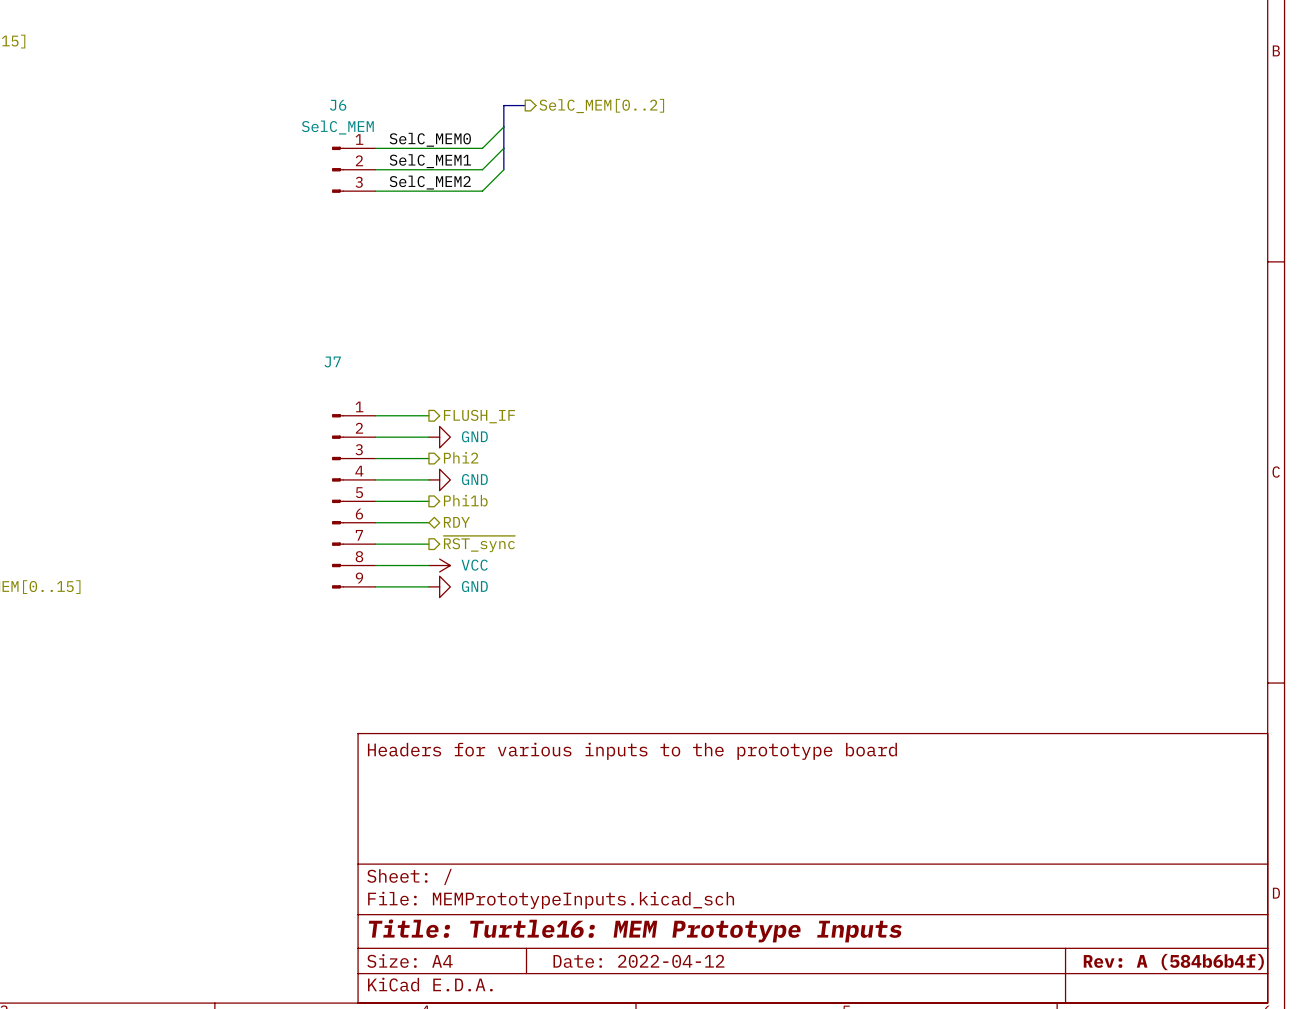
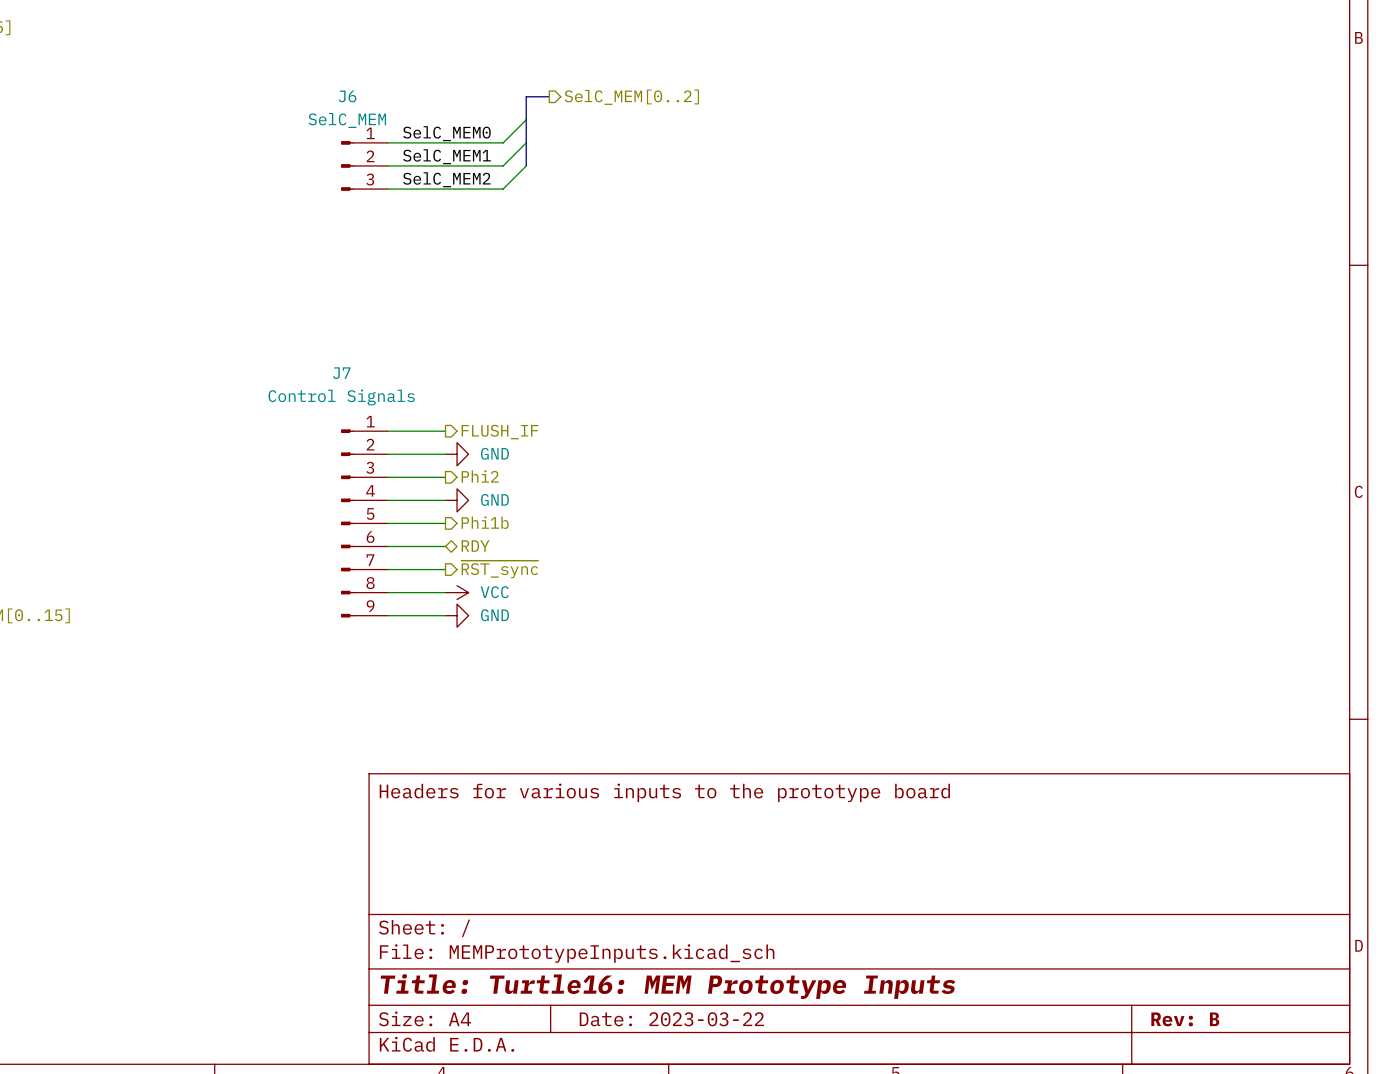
J7 value: none -> Control Signals (341, 397)
title block: Date: 2022-04-12 (638, 961) -> Date: 2023-03-22 (671, 1019)
title block: Rev: A (584b6b4f) (1173, 962) -> Rev: B (1185, 1019)

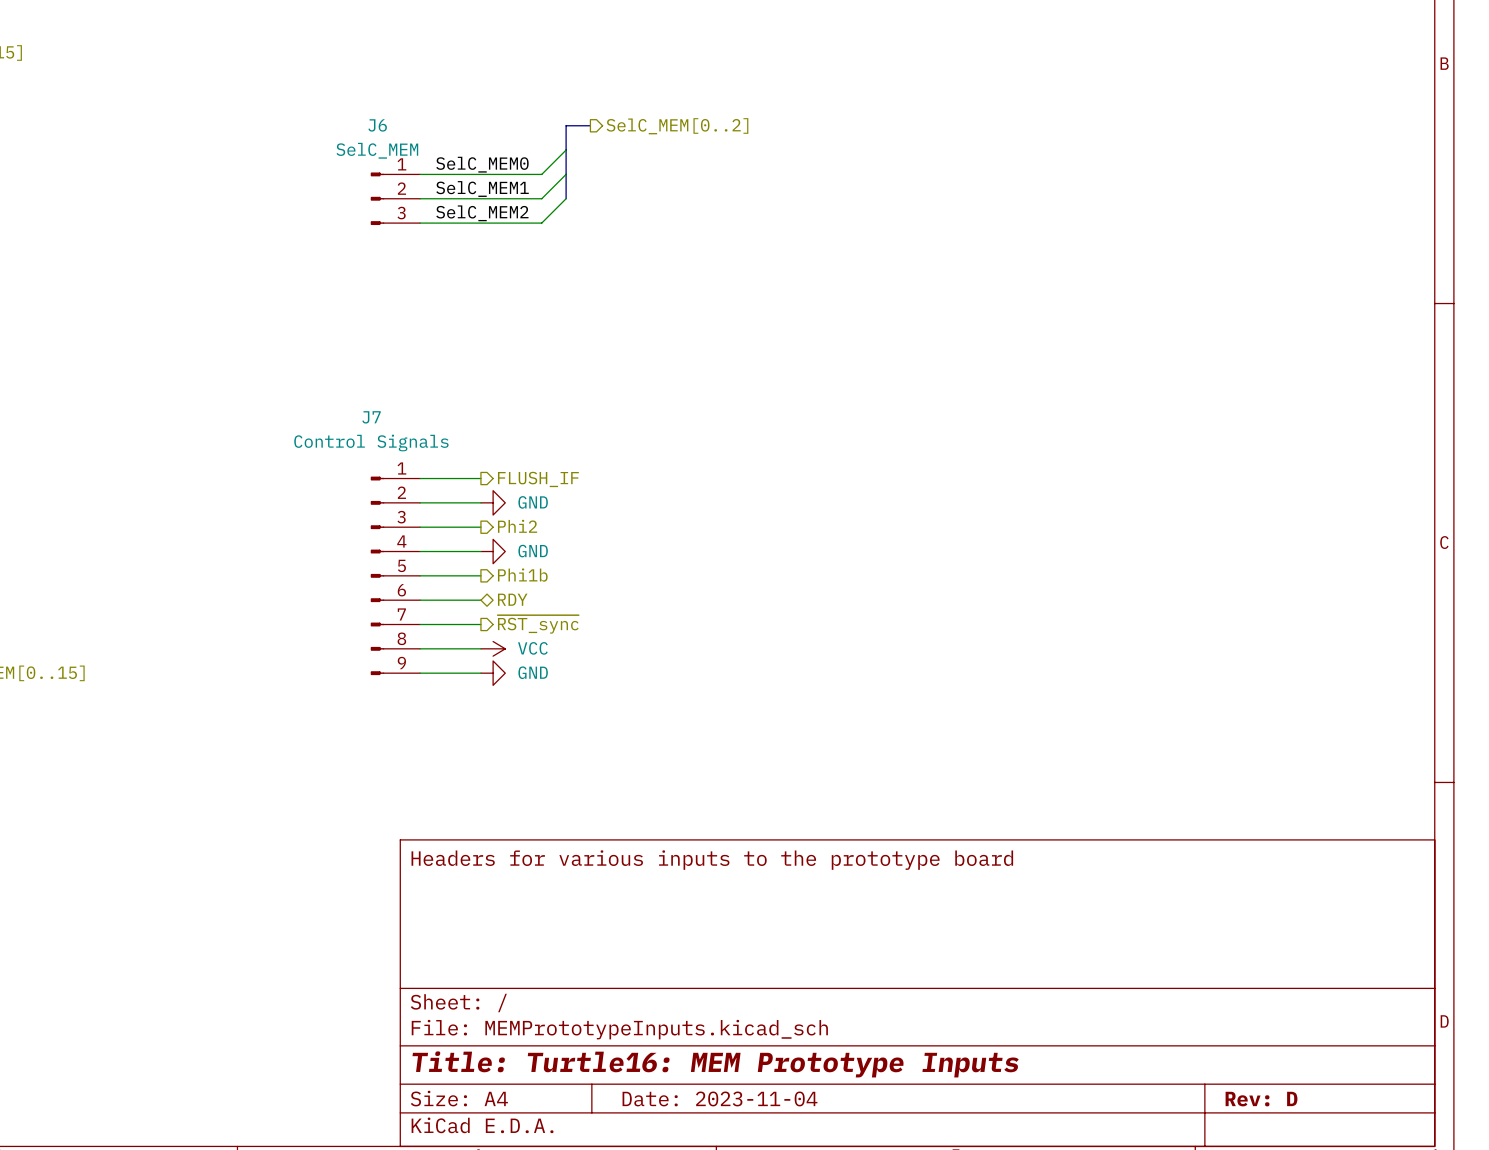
title block: Date: 2023-03-22 (671, 1019) -> Date: 2023-11-04 (719, 1098)
title block: Rev: B (1185, 1019) -> Rev: D (1261, 1099)

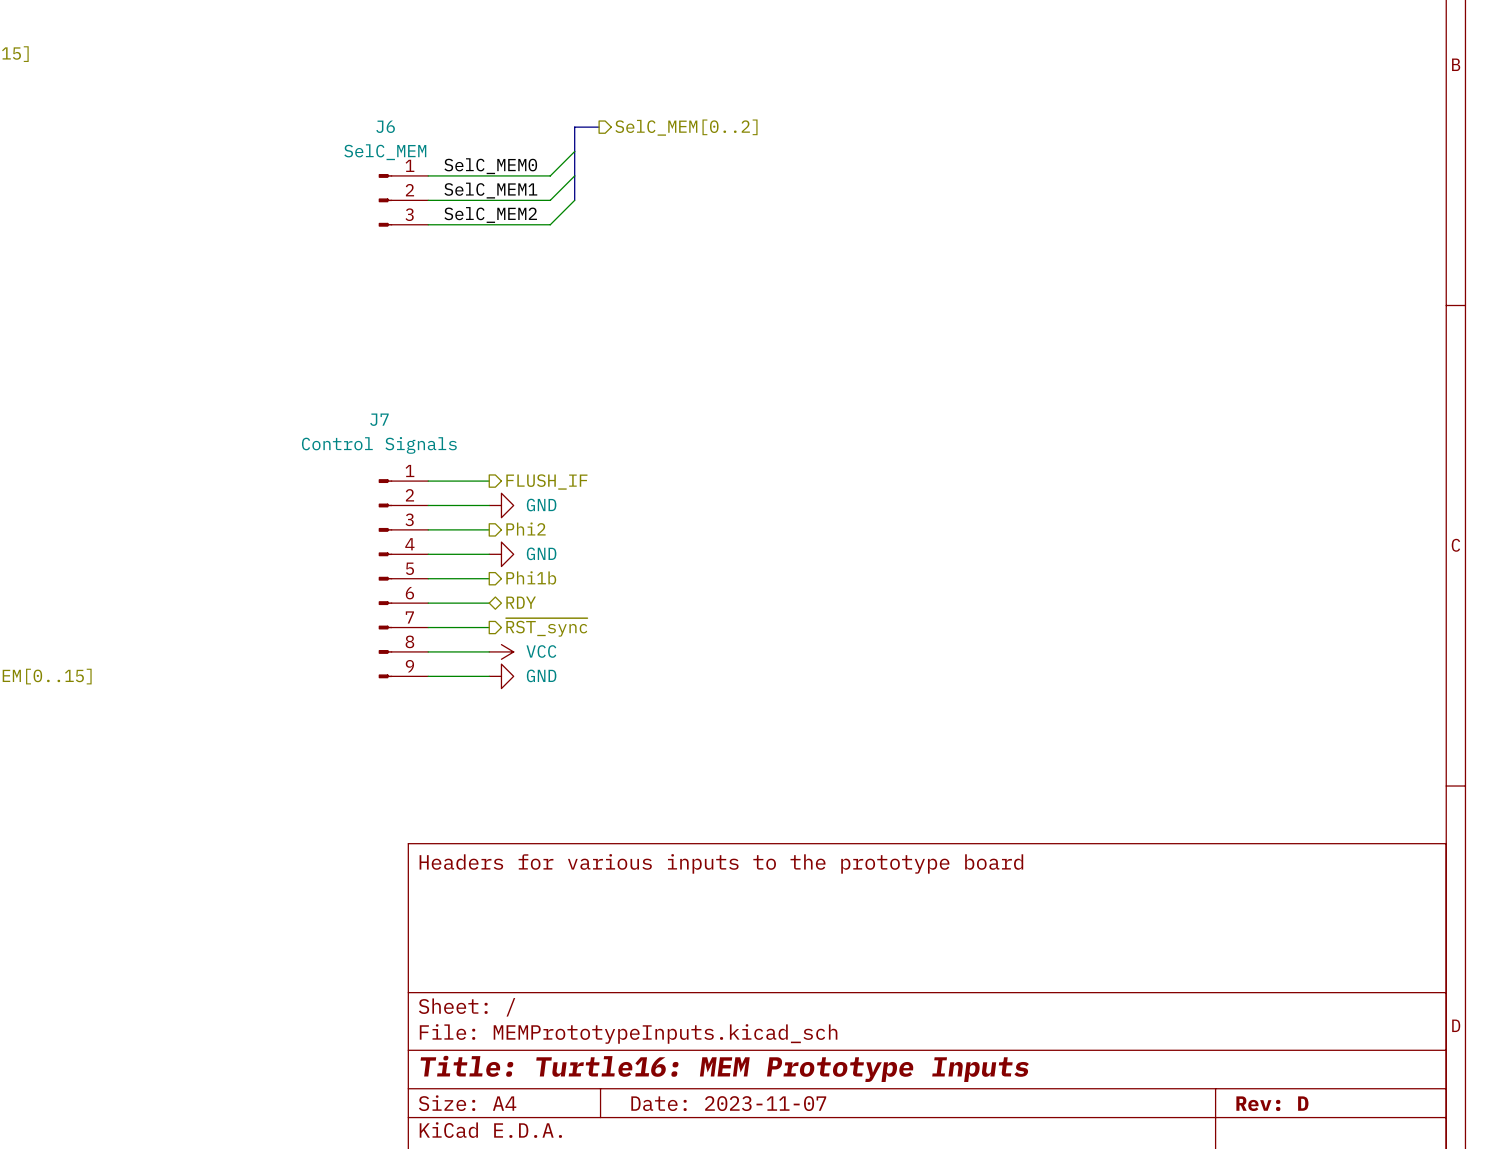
title block: Date: 2023-11-04 (719, 1098) -> Date: 2023-11-07 (728, 1103)

